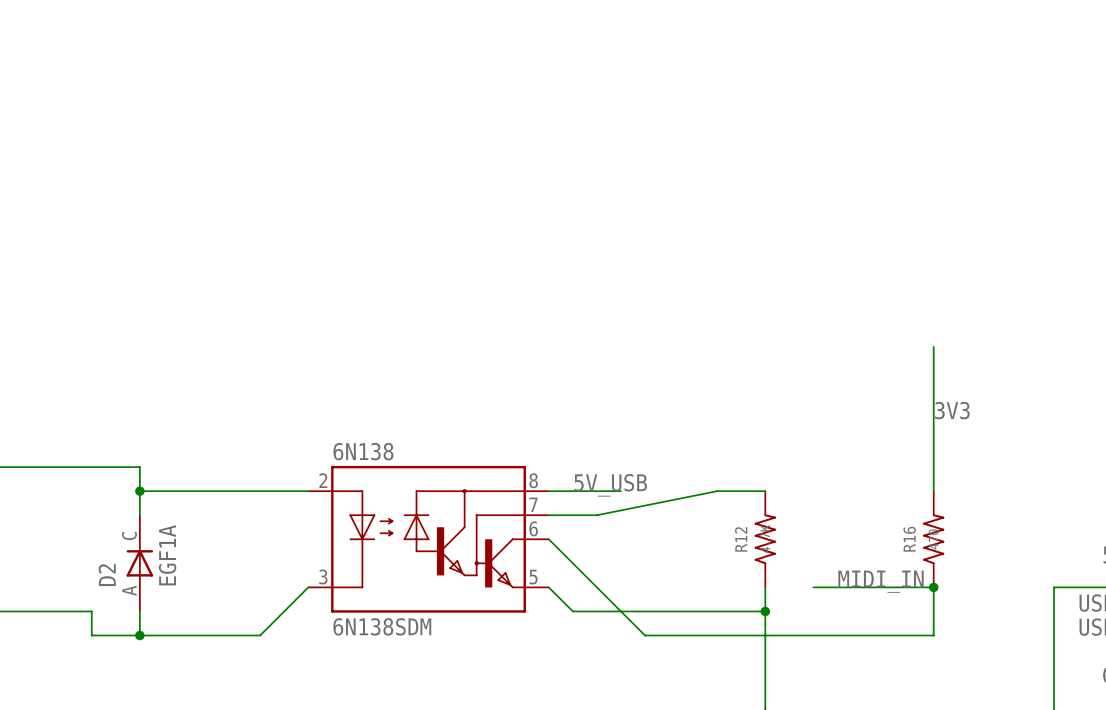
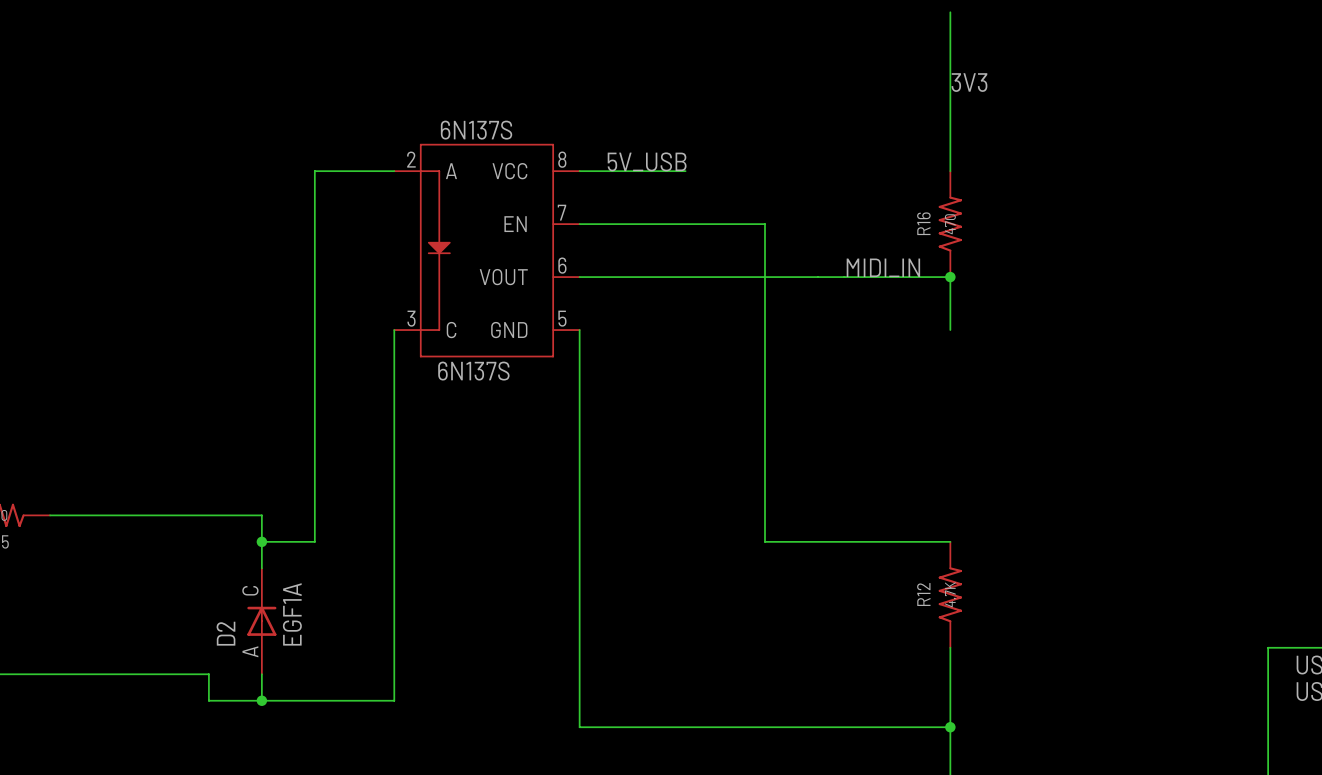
wire: none -> (950, 12) (950, 171)
label: none -> 3V3 (969, 82)
label: none -> 5V_USB (647, 161)
wire: none -> (579, 171) (685, 171)
6N137S: none -> 6N137S (486, 250)
label: none -> MIDI_IN (883, 267)
wire: none -> (579, 277) (950, 277) (950, 330)
junction: none -> (950, 277)
wire: none -> (579, 330) (579, 727) (950, 727)
wire: (933, 346) (933, 491) -> none
label: 3V3 (952, 410) -> none
label: 5V_USB (610, 485) -> none
wire: (187, 491) (308, 491) -> (314, 541) (314, 171) (394, 171)
wire: (548, 491) (596, 491) -> (579, 224) (765, 224) (765, 541)
wire: (717, 491) (596, 515) (548, 515) -> (897, 541) (791, 541)
6N138: 6N138SDM (428, 539) -> none
wire: (548, 539) (645, 635) (933, 635) (933, 587) (813, 587) -> none
R16 position: (933, 539) -> (950, 224)
label: MIDI_IN (881, 581) -> none
wire: (308, 587) (260, 635) -> (394, 330) (394, 700)
wire: (548, 587) (572, 611) (765, 611) -> none
junction: (933, 587) -> none
junction position: (765, 611) -> (950, 727)

